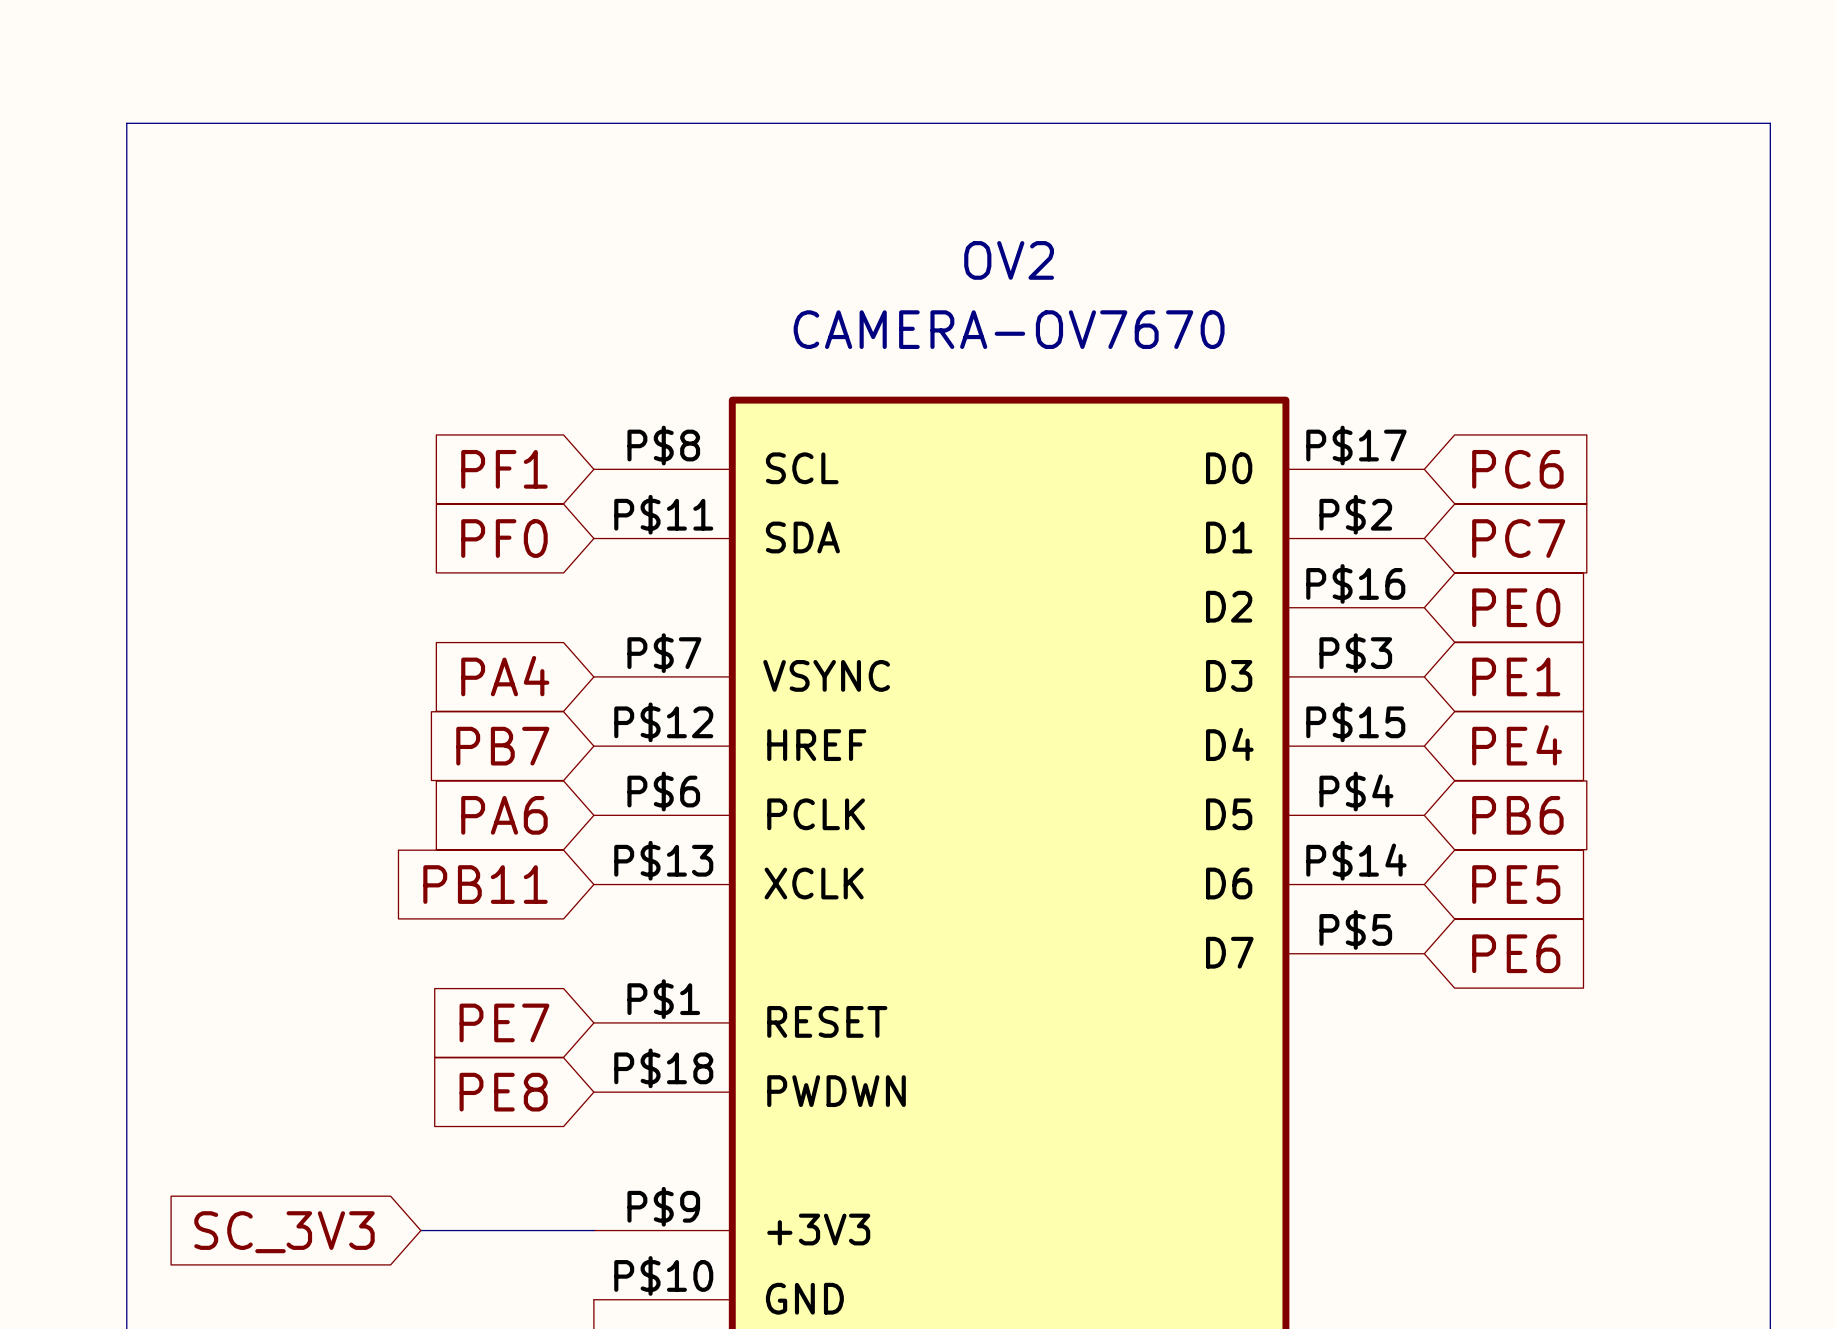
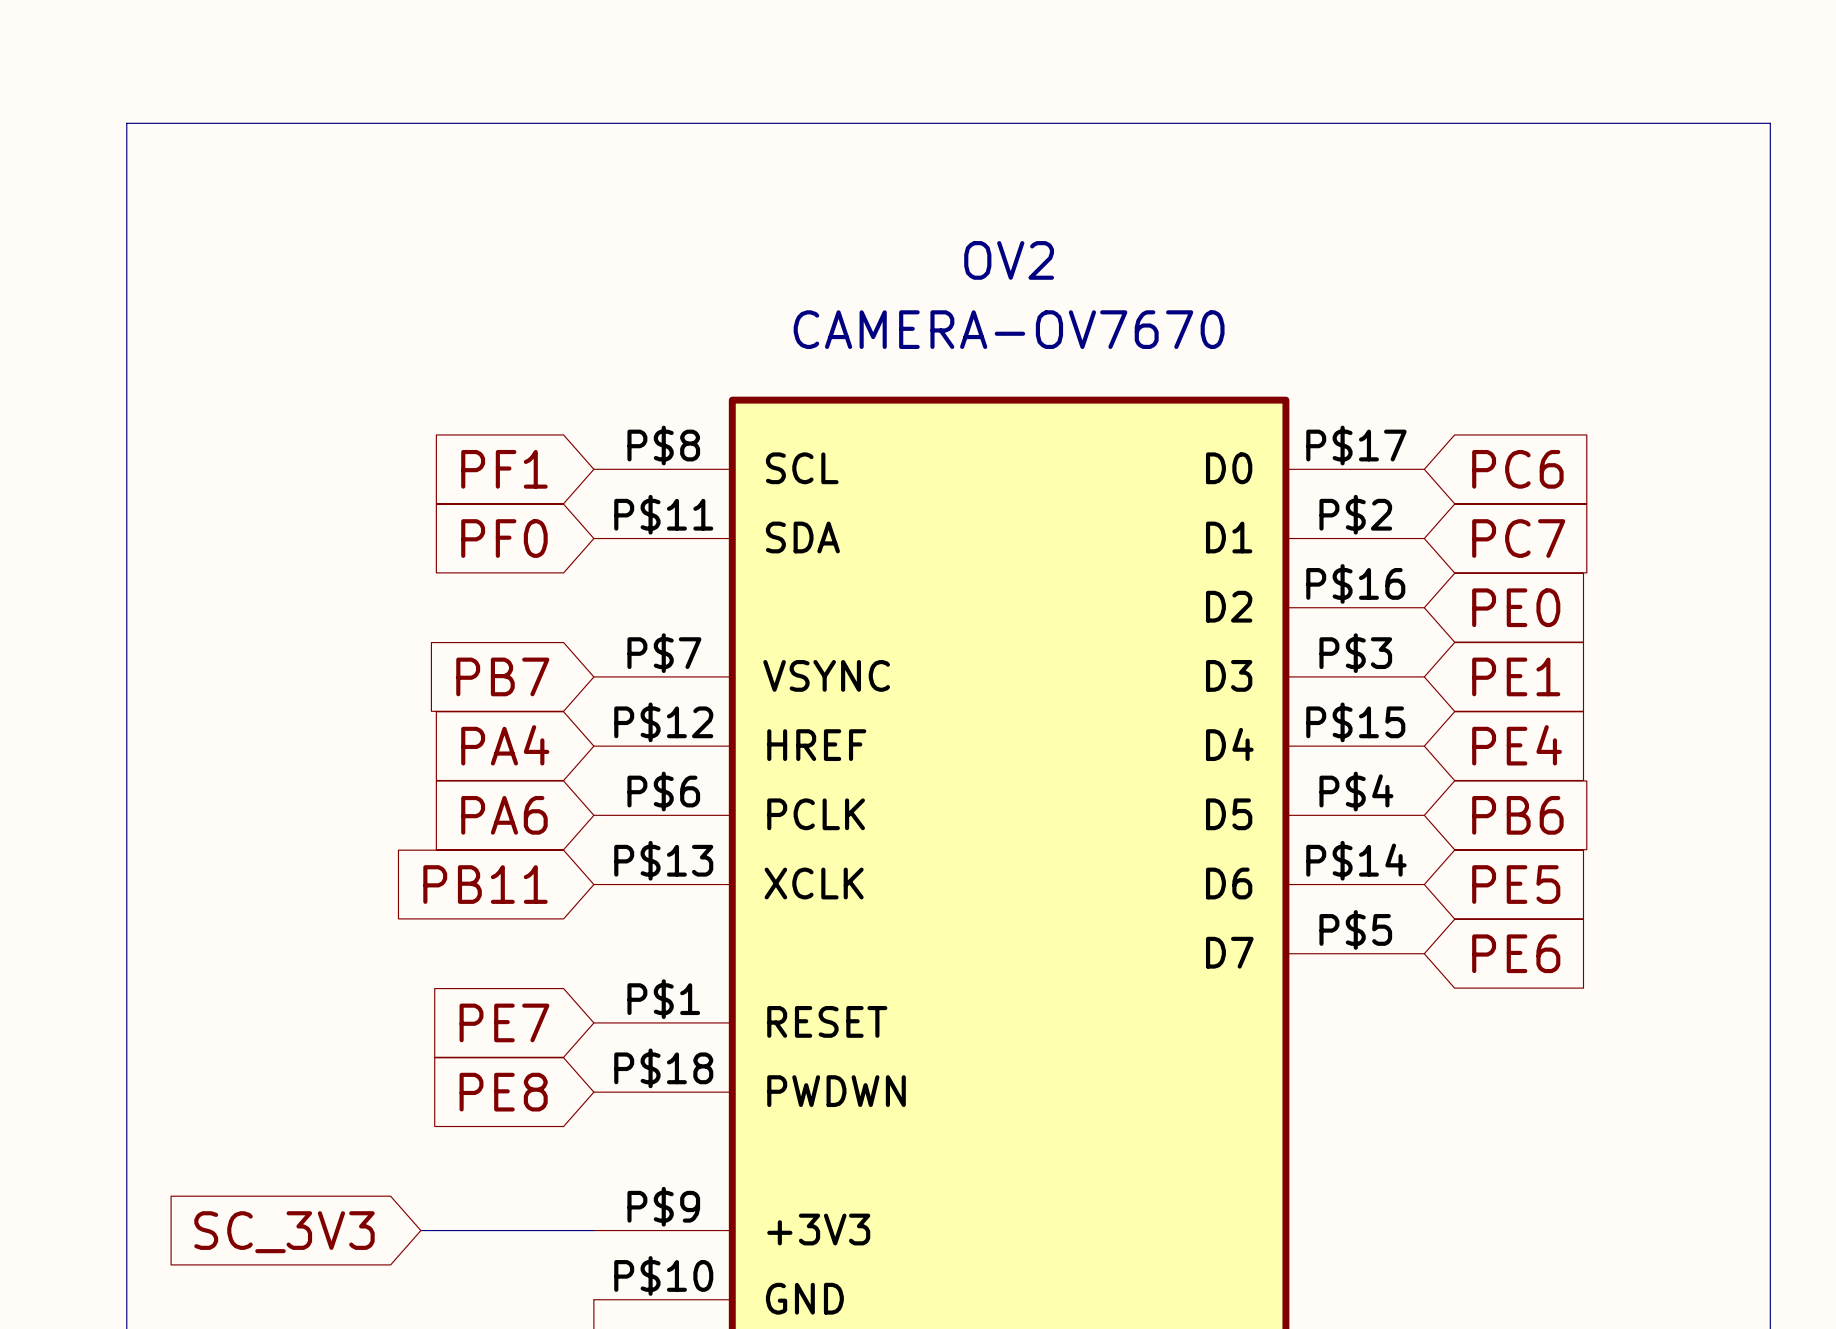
global label: PA4 (505, 676) -> PB7 (502, 676)
global label: PB7 (502, 746) -> PA4 (505, 745)

